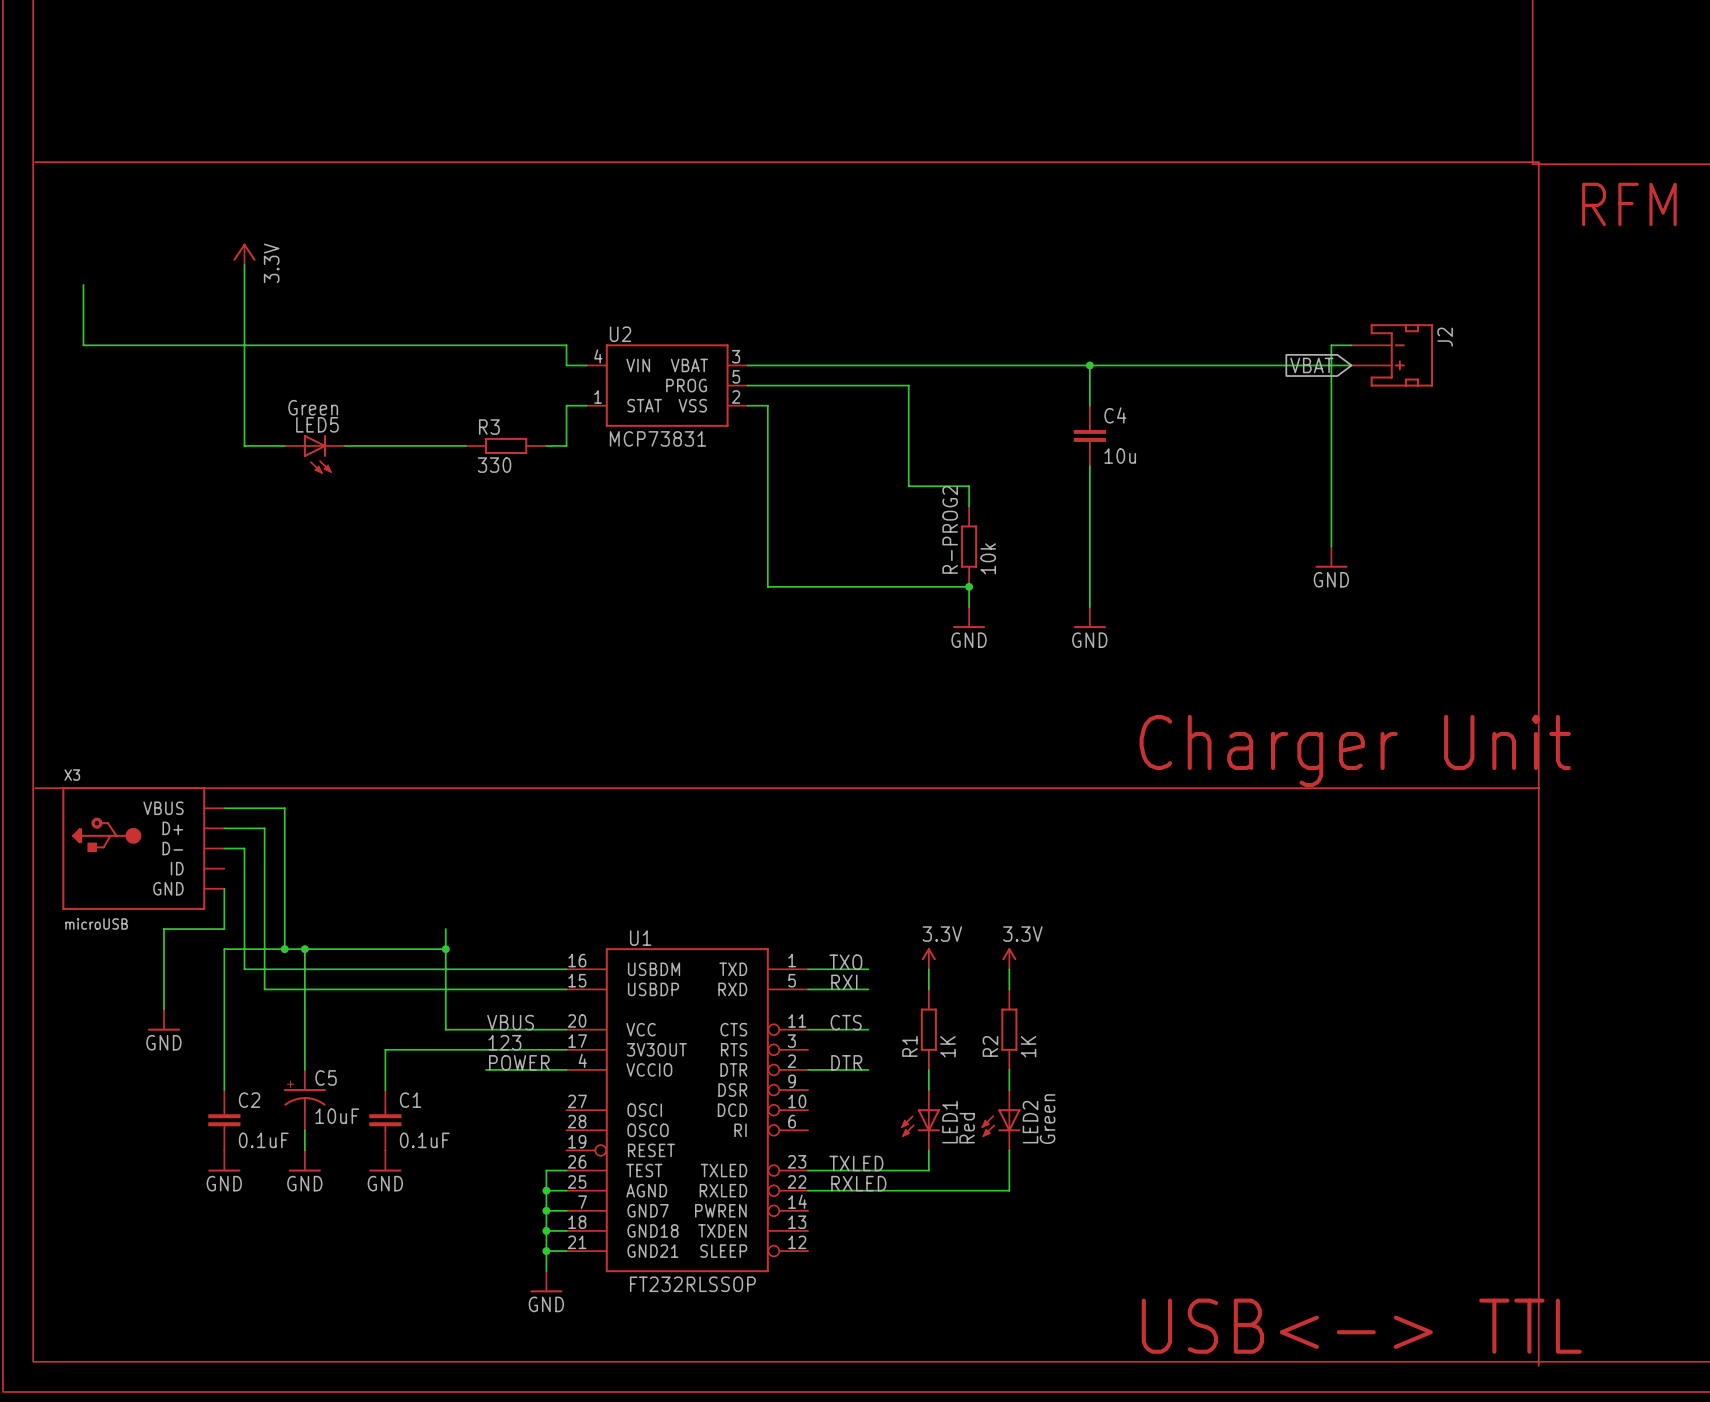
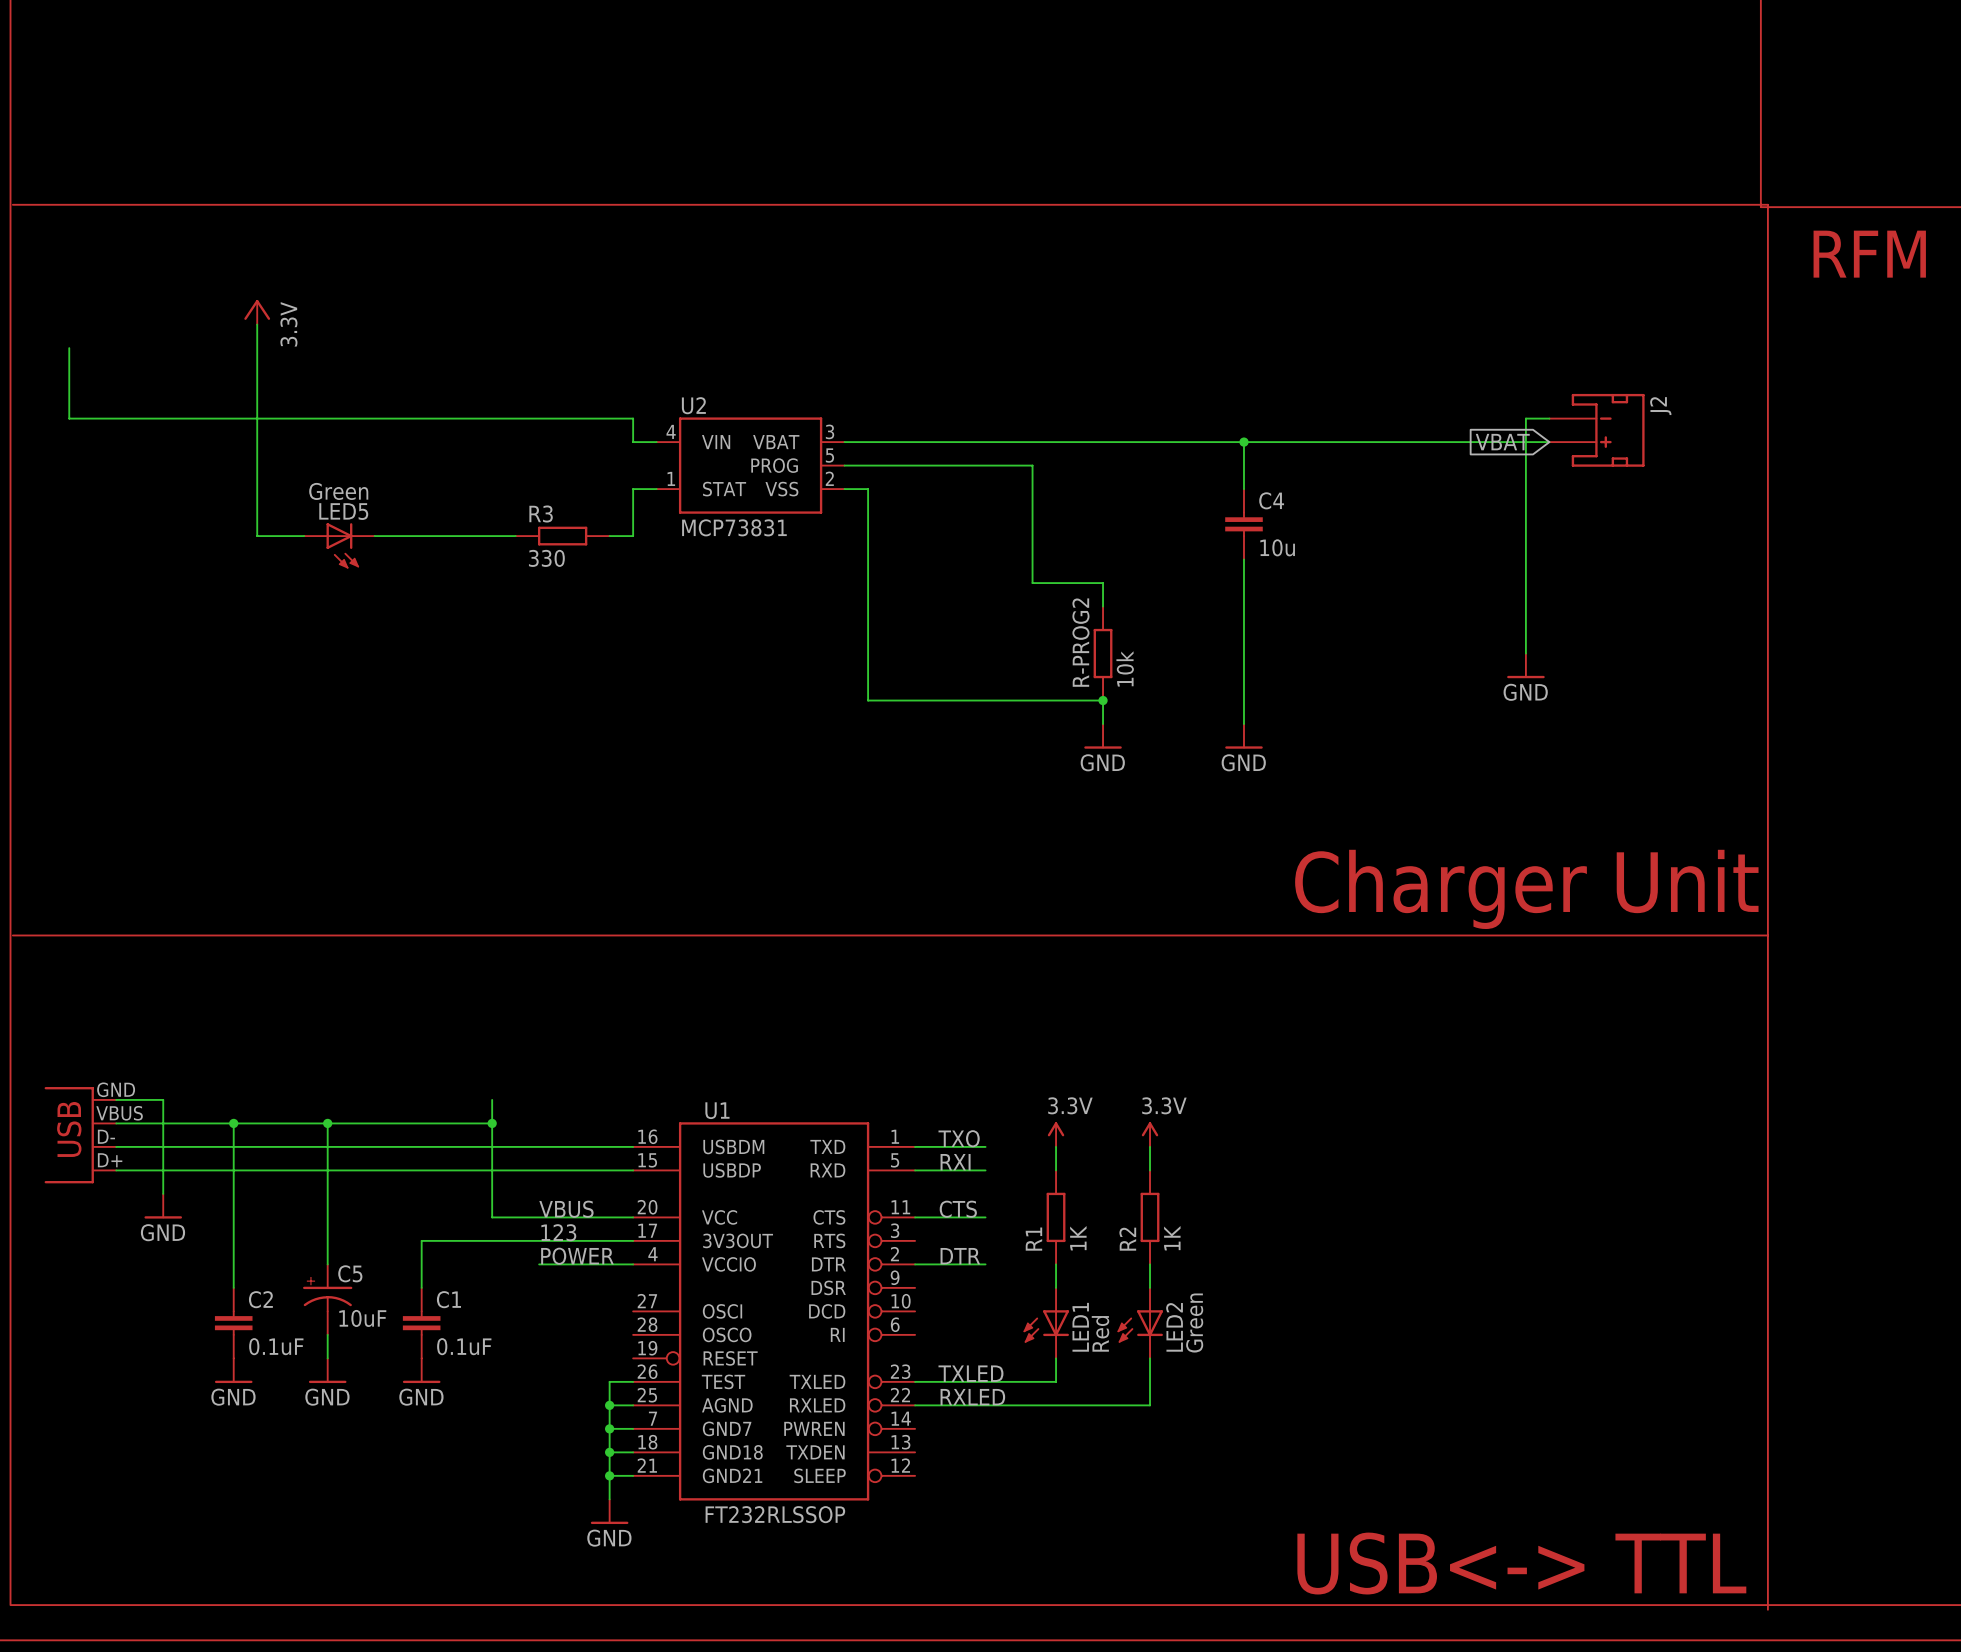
wire: (224, 808) (284, 808) (284, 949) -> none
wire: (224, 828) (264, 828) (264, 989) -> (116, 1170) (280, 1170)
X3: microUSB (143, 848) -> none
wire: (224, 848) (244, 848) (244, 969) -> (116, 1146) (257, 1146)
wire: (224, 888) (224, 929) (163, 929) -> (116, 1099) (163, 1099)
wire: none -> (116, 1123) (233, 1123)
junction: none -> (233, 1123)
junction: (284, 949) -> none
part: none -> (80, 1135)

